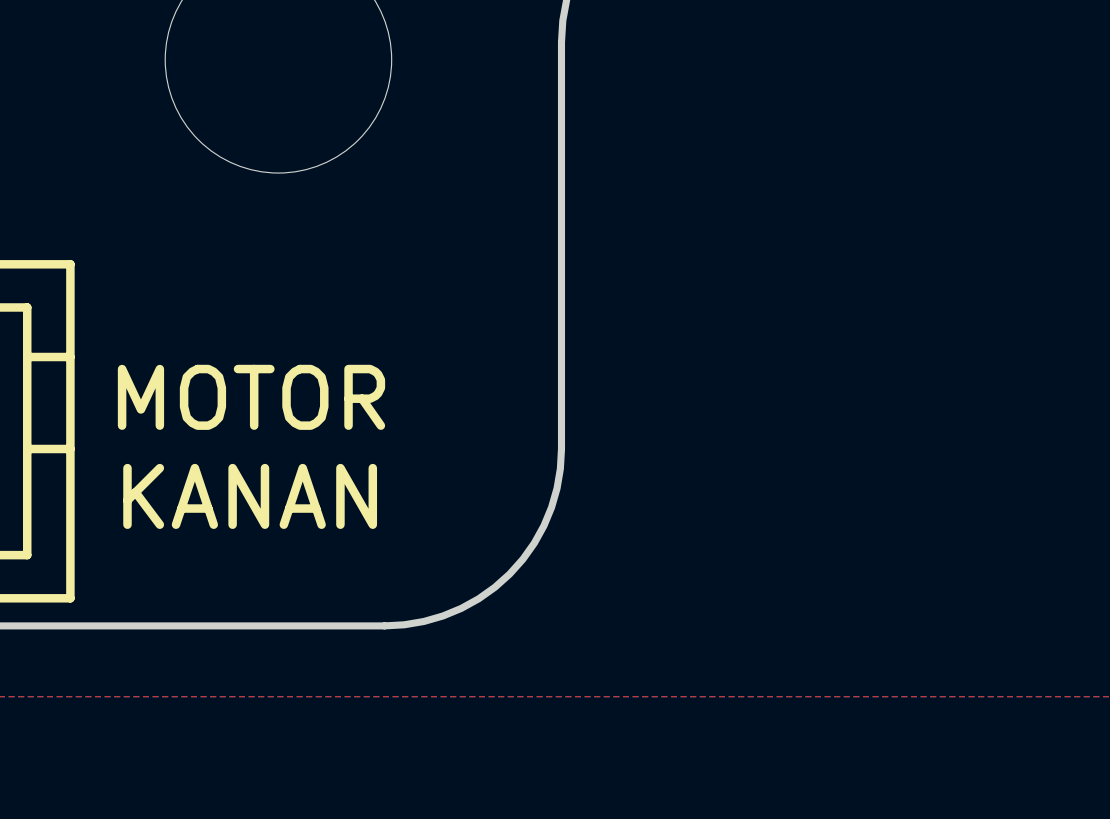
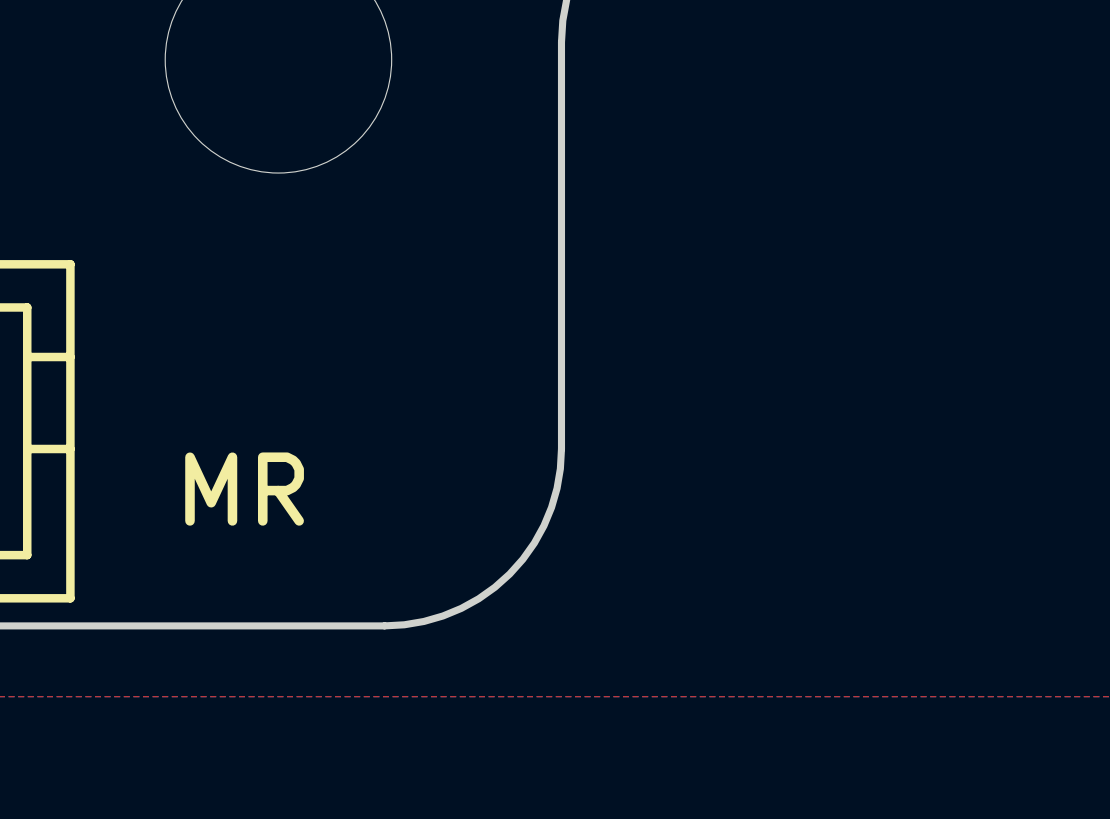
text: MOTOR (251, 397) -> none
text: KANAN (250, 496) -> MR (244, 489)

